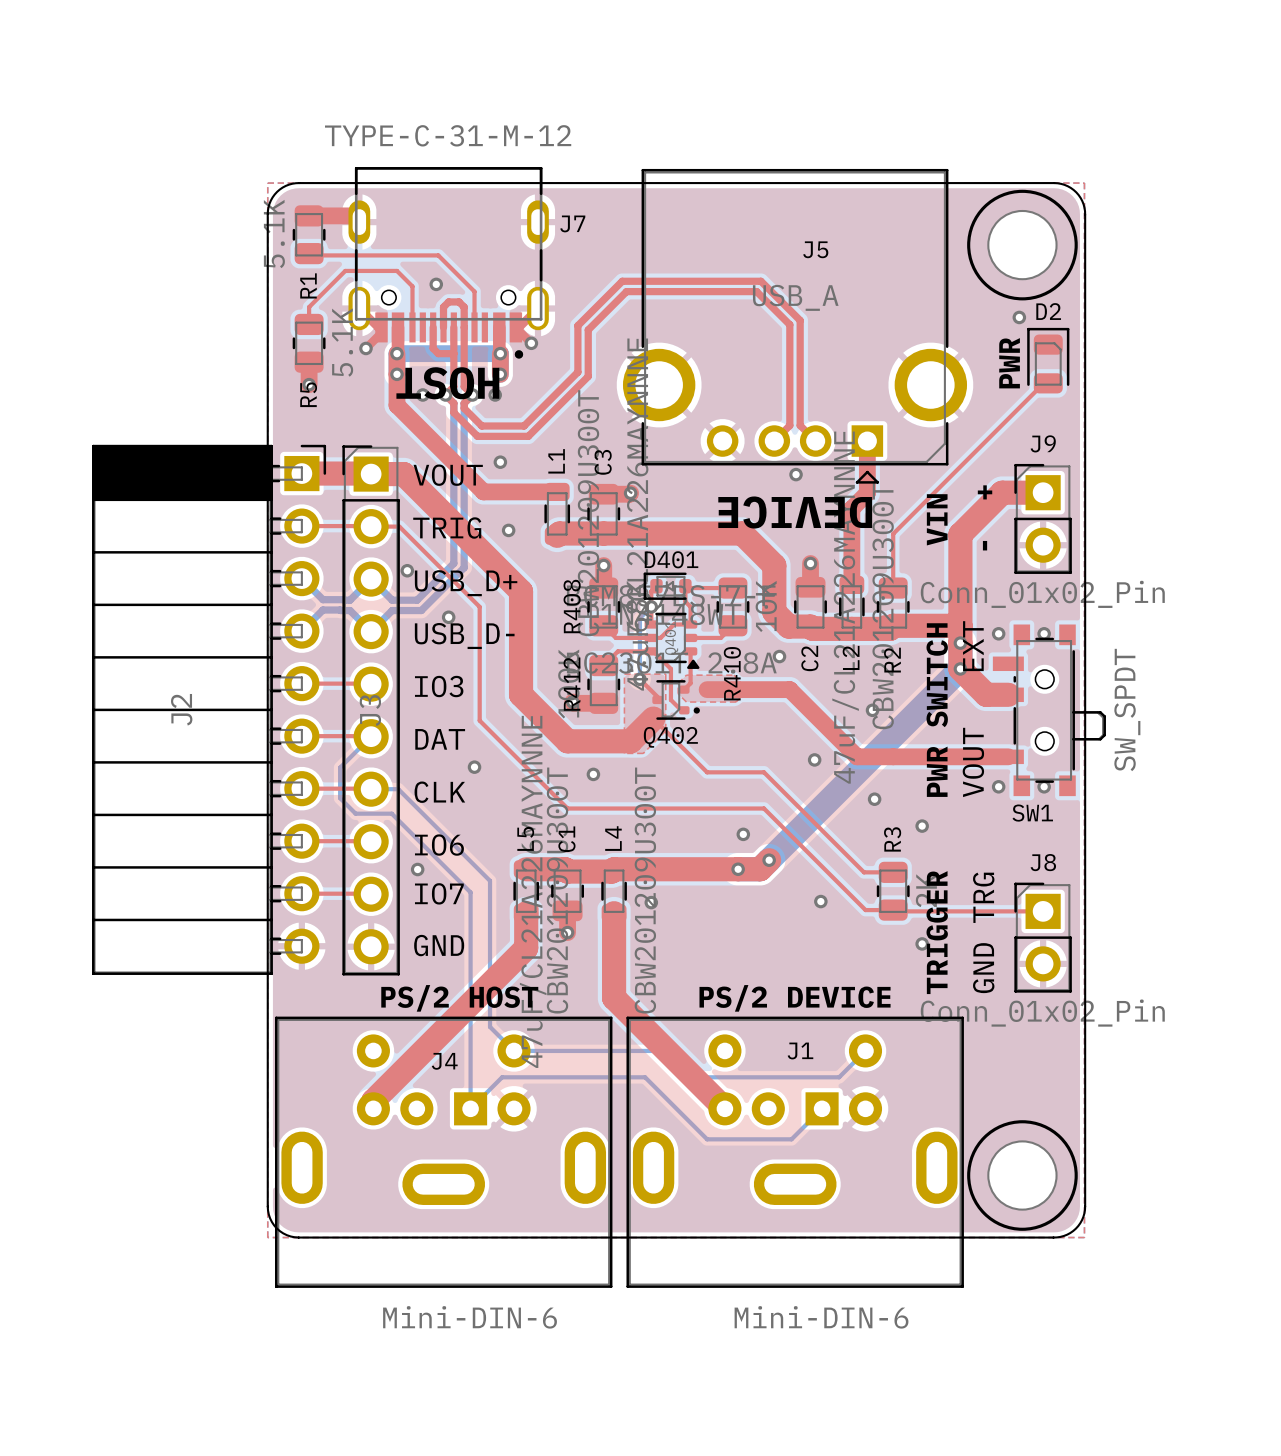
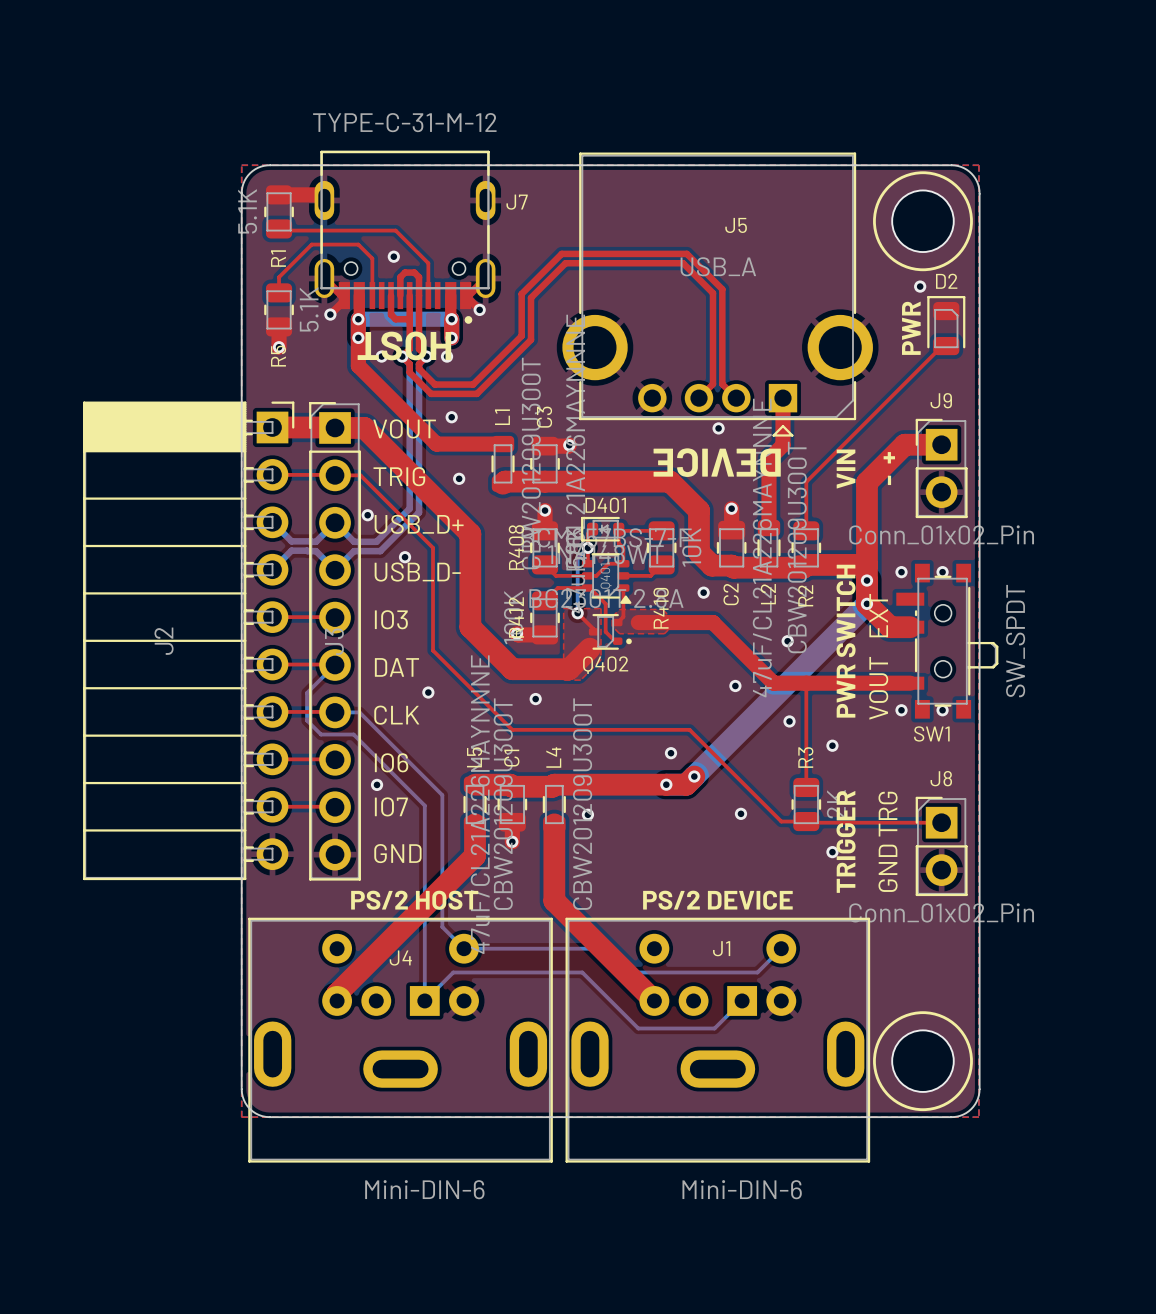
top track: (653, 718) (707, 772) (763, 772) (864, 872) (885, 872) -> none
top track: none -> (806, 683) (806, 787)

